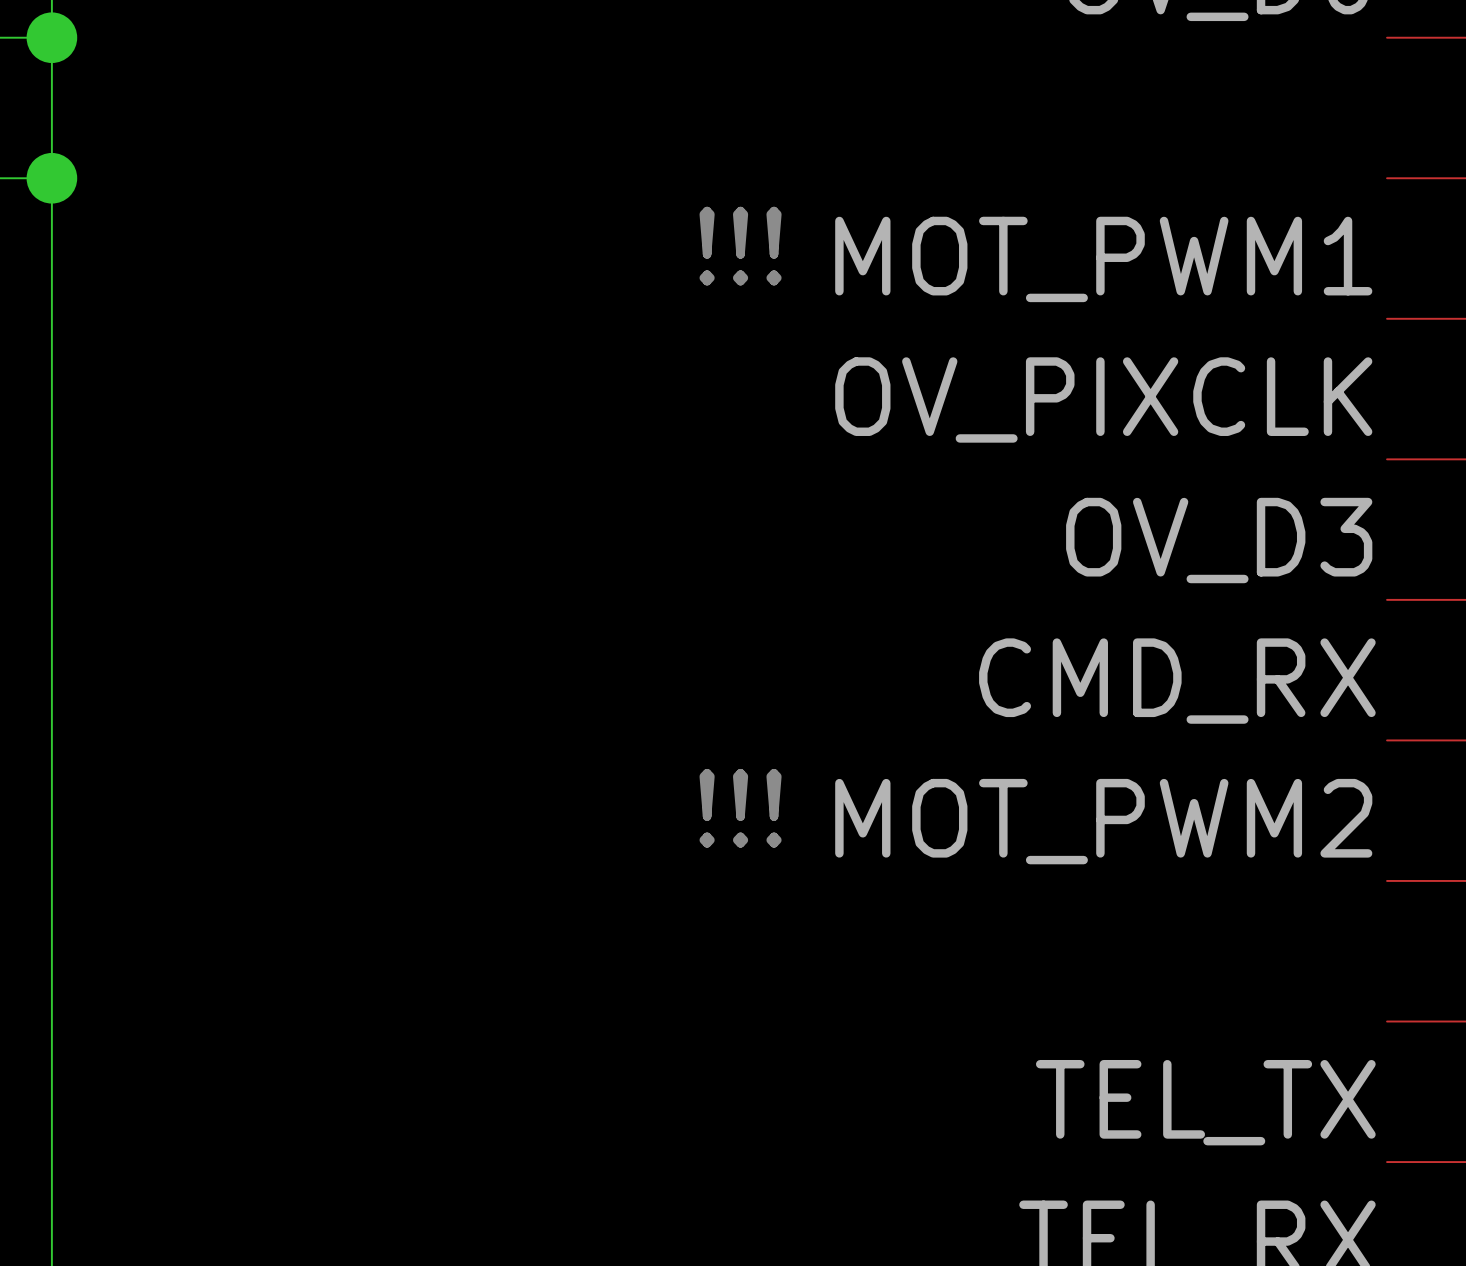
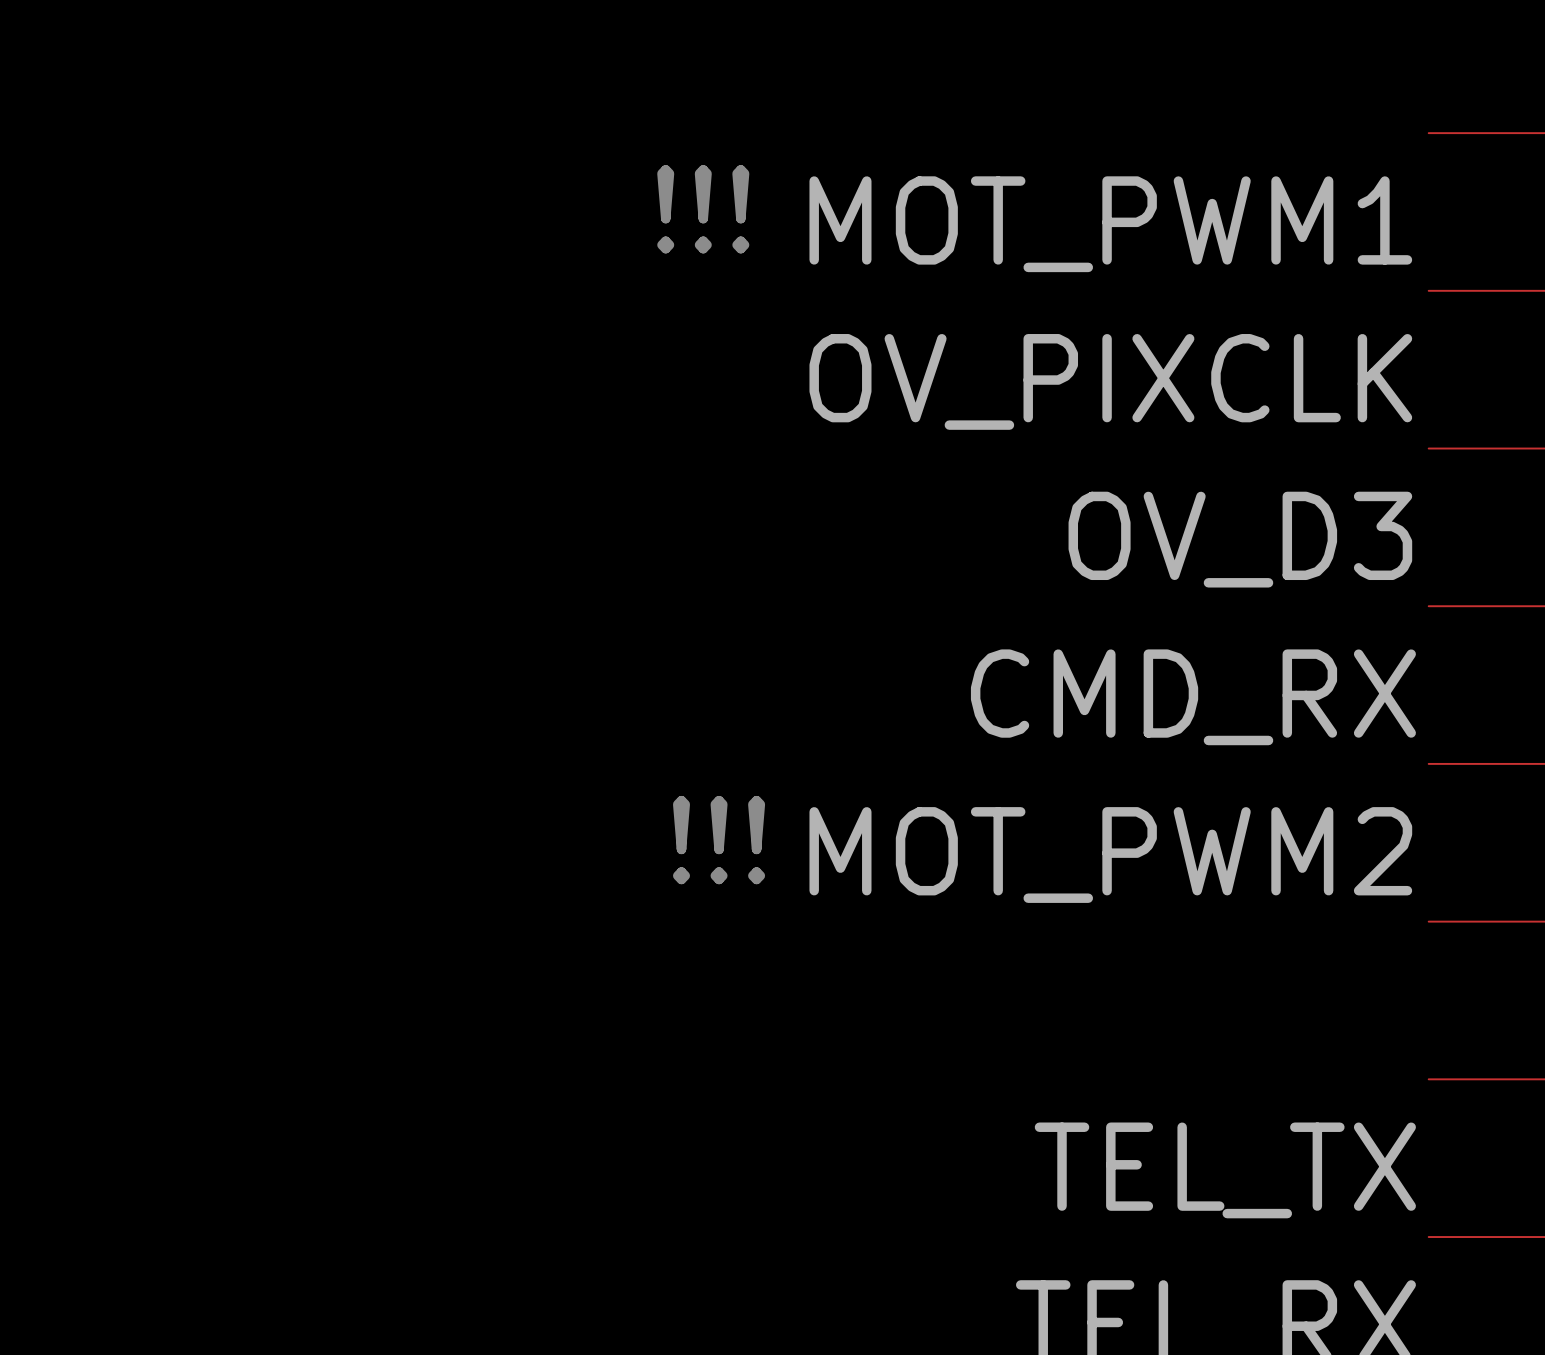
text position: !!! (740, 808) -> !!! (719, 840)

